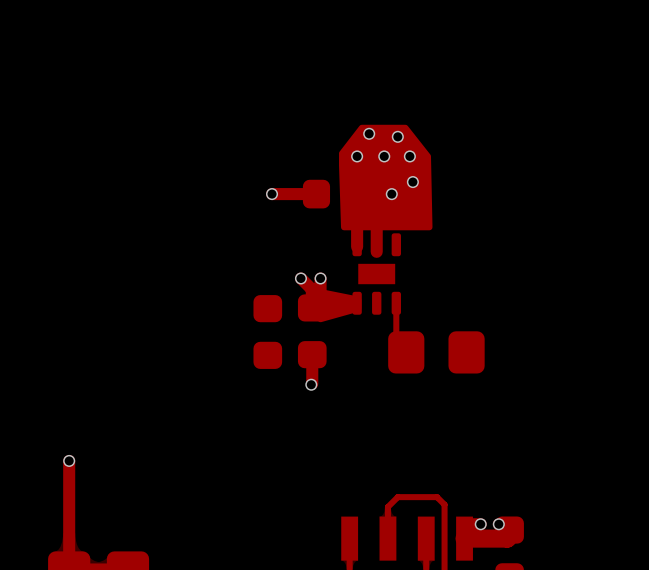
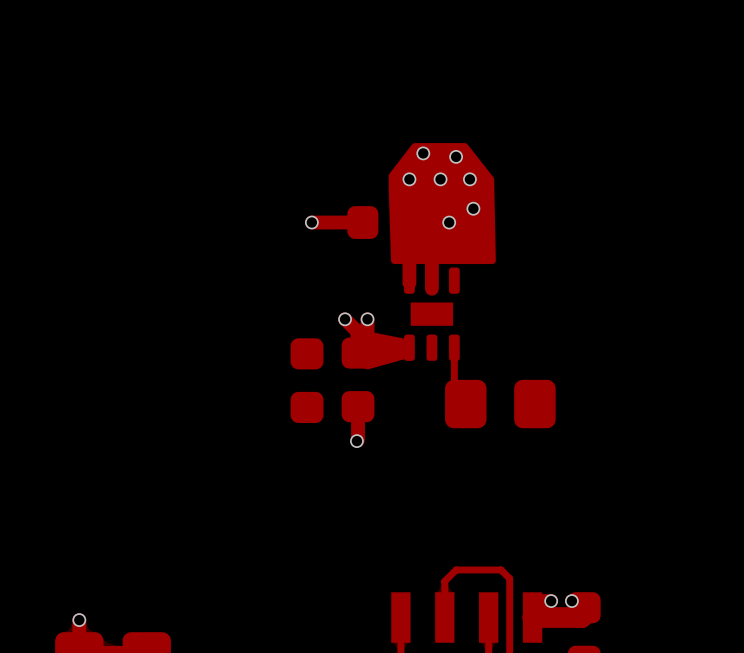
top track: (69, 460) (69, 540) -> none
via position: (69, 460) -> (79, 620)

